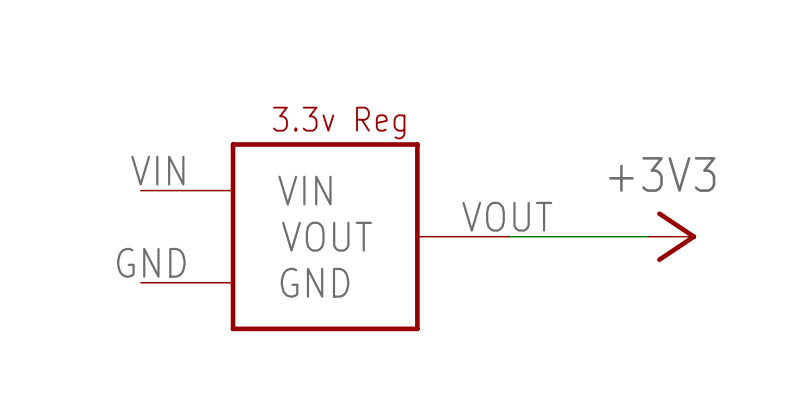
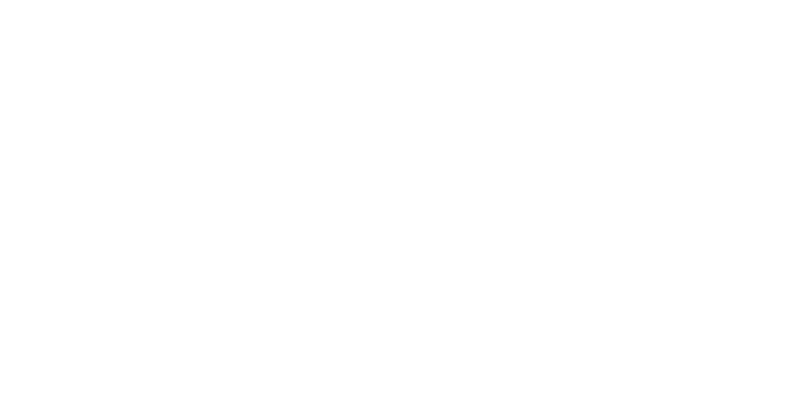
part: (325, 236) -> none
wire: (509, 236) (647, 236) -> none
power symbol: +3V3 (672, 236) -> none

